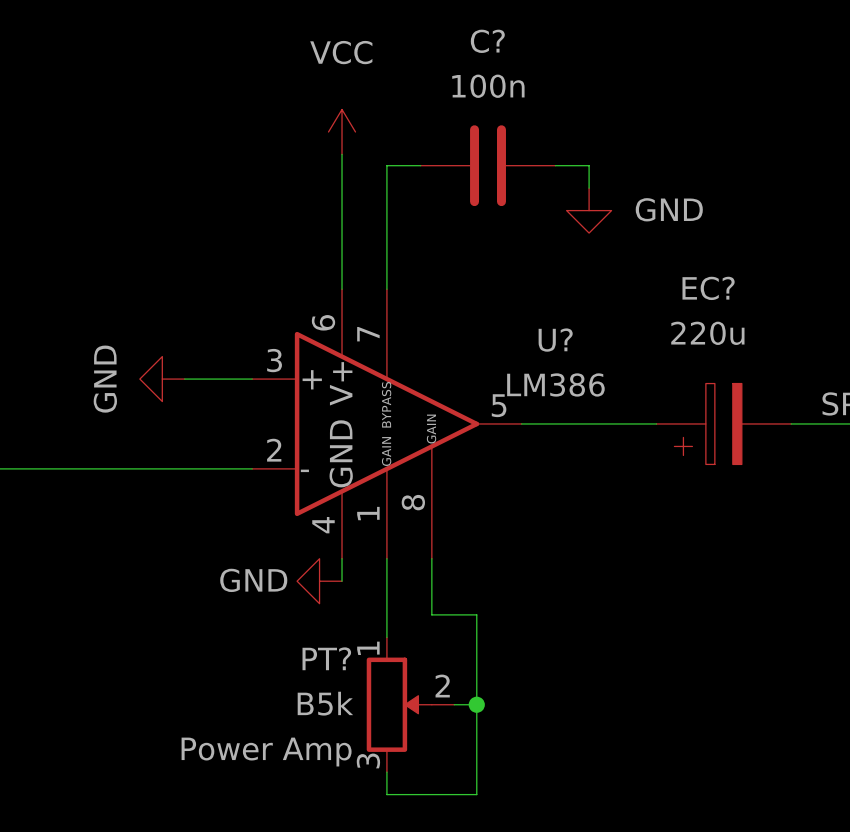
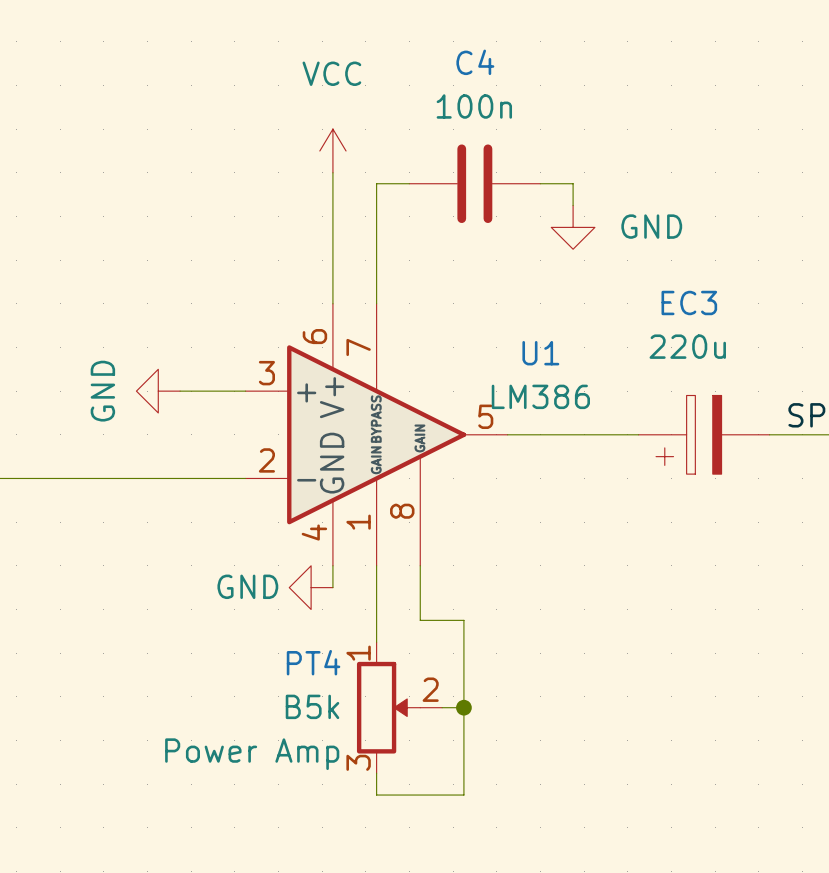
C? name: C? (487, 41) -> C4 (475, 62)
EC? name: EC? (708, 288) -> EC3 (689, 302)
U? name: U? (555, 340) -> U1 (540, 353)
PT? name: PT? (326, 658) -> PT4 (313, 662)

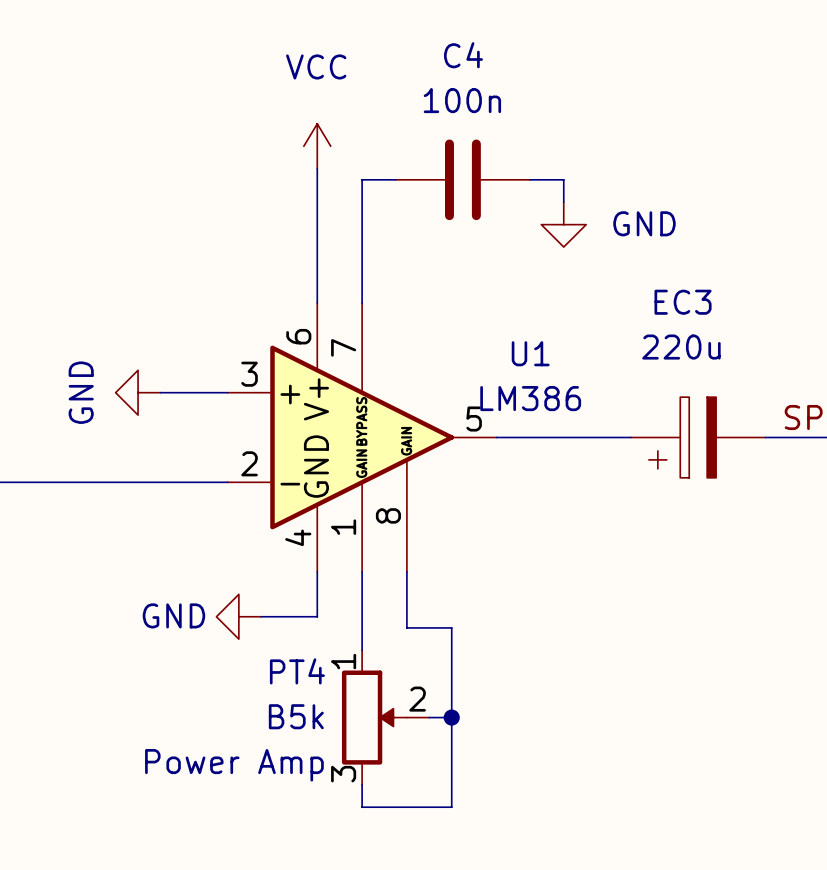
power symbol position: GND (311, 587) -> GND (238, 616)
wire: none -> (317, 594) (317, 616) (261, 616)

